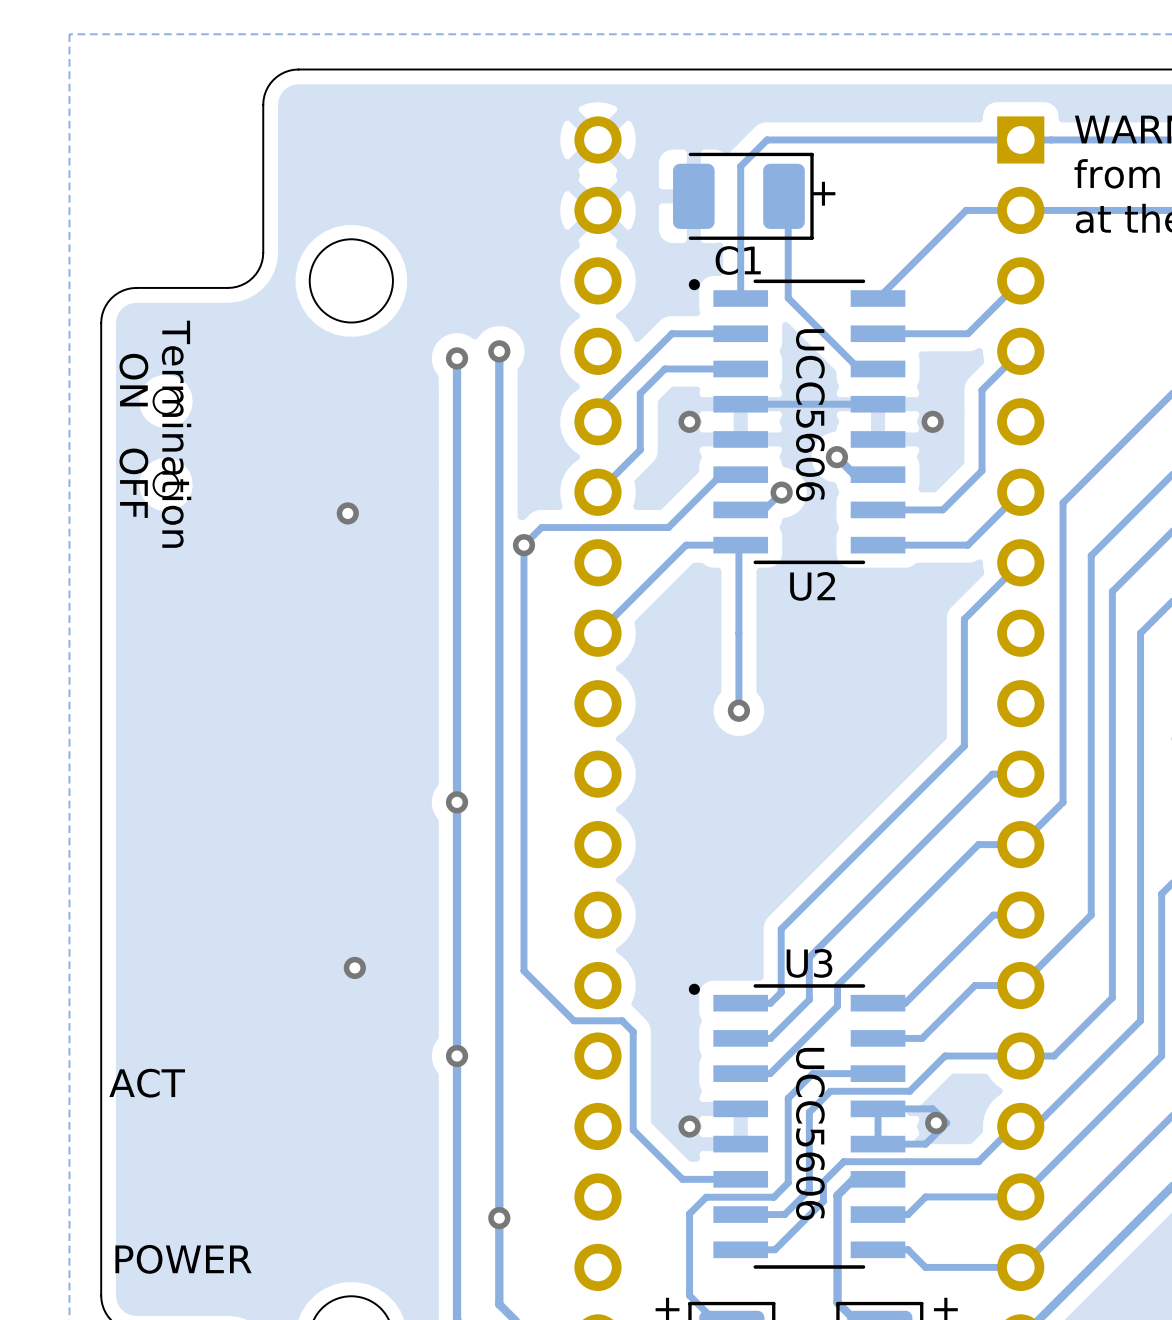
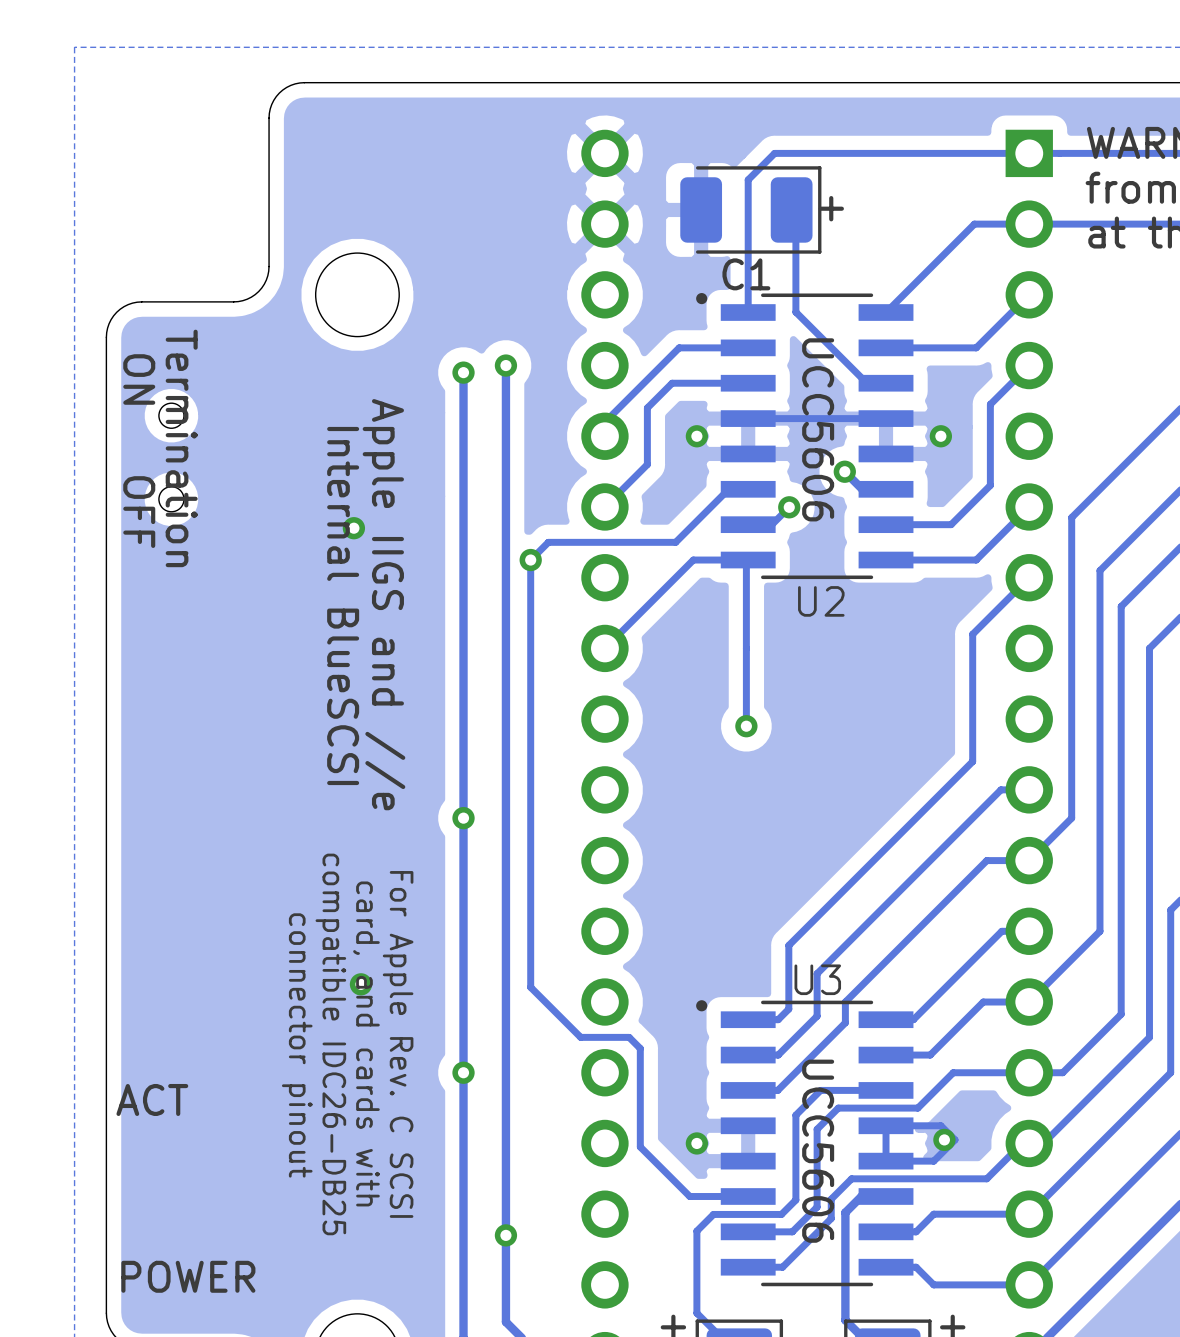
text: none -> Internal BlueSCSI (343, 605)
text: none -> Apple IIGS and //e (383, 604)
text: none -> compatible IDC26-DB25 (330, 1044)
text: none -> card, and cards with (366, 1043)
text: none -> For Apple Rev. C SCSI (398, 1044)
text: none -> connector pinout (297, 1045)

